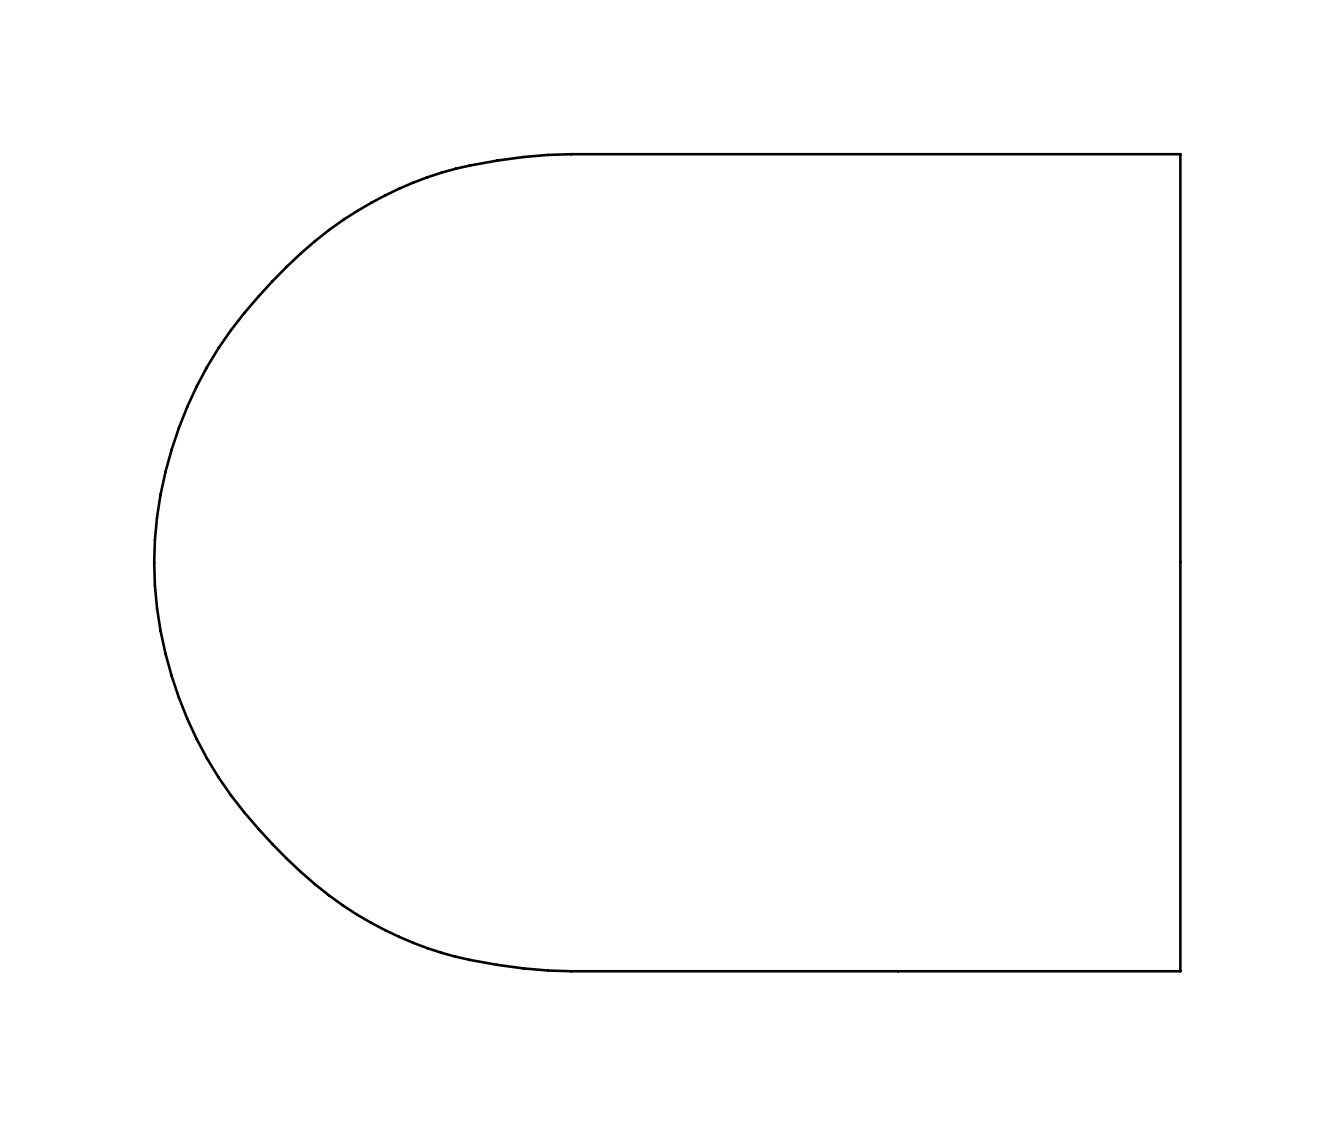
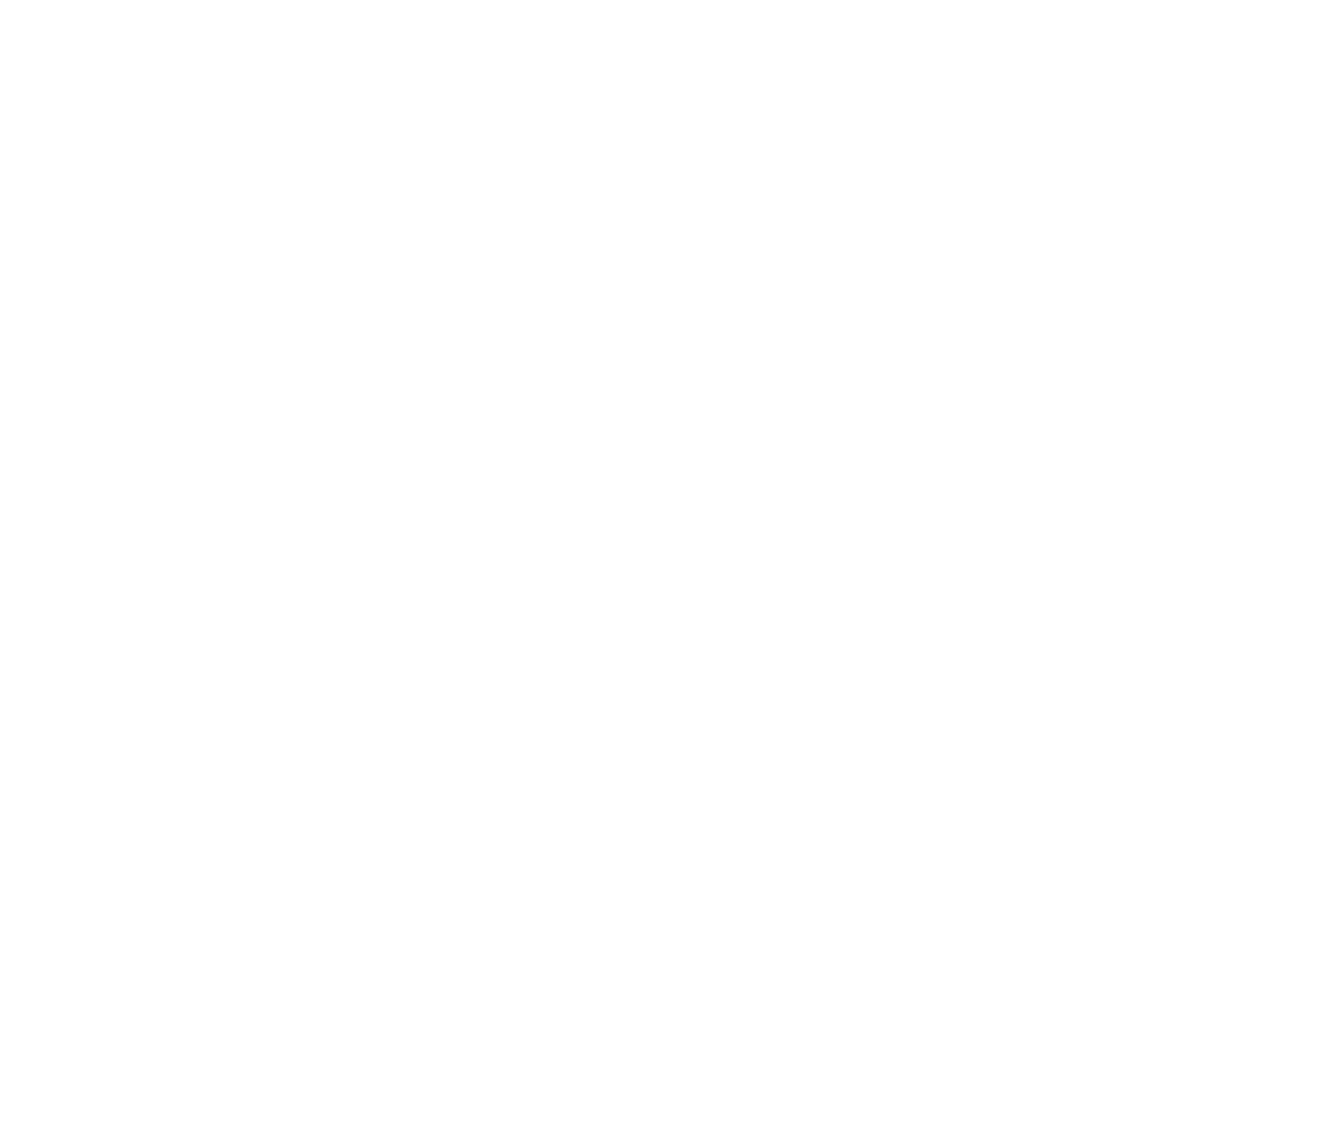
board edge: (1180, 154) (547, 154) (497, 160) (441, 172) (385, 195) (343, 219) (314, 241) (286, 266) (258, 296) (230, 330) (196, 386) (178, 428) (165, 471) (154, 540) (154, 585) (160, 630) (178, 697) (196, 738) (218, 777) (244, 812) (272, 844) (300, 871) (329, 895) (357, 914) (399, 936) (441, 952) (469, 959) (523, 968) (571, 971) (1180, 971) (1180, 154) -> none

